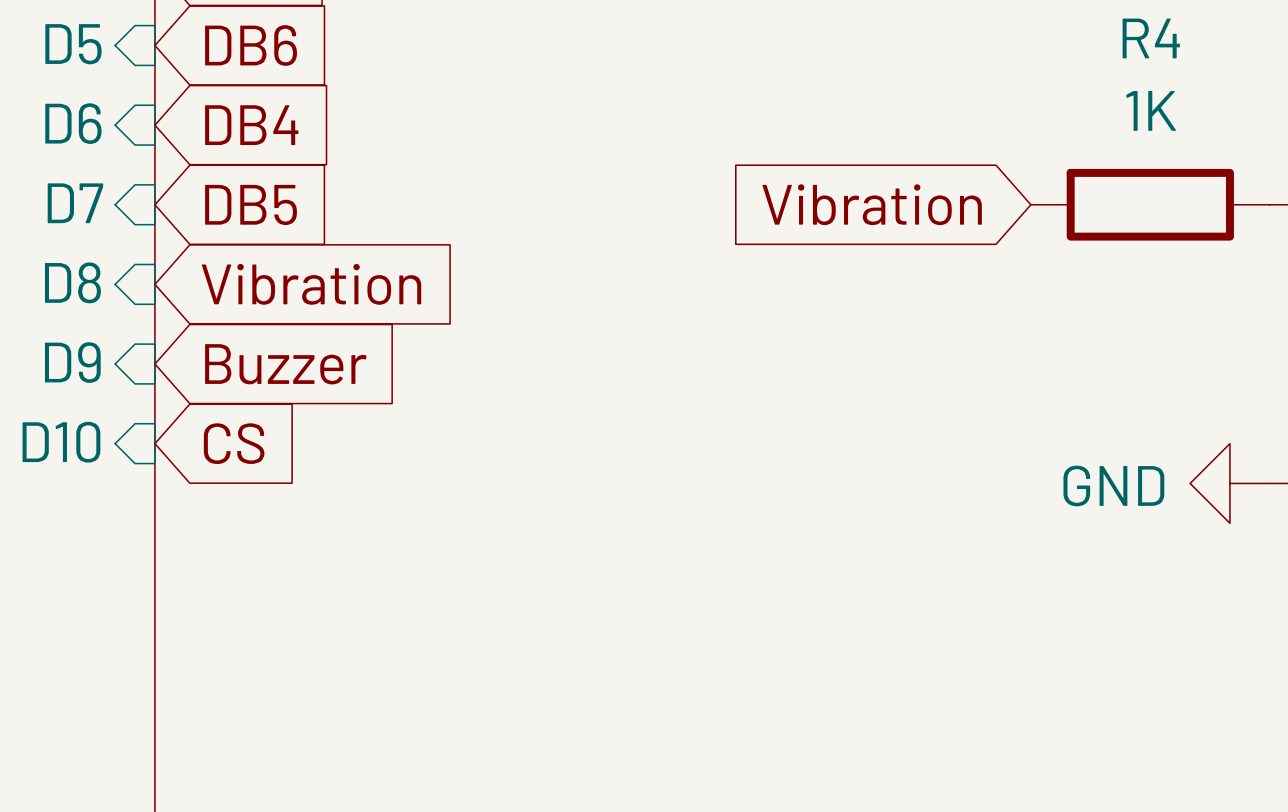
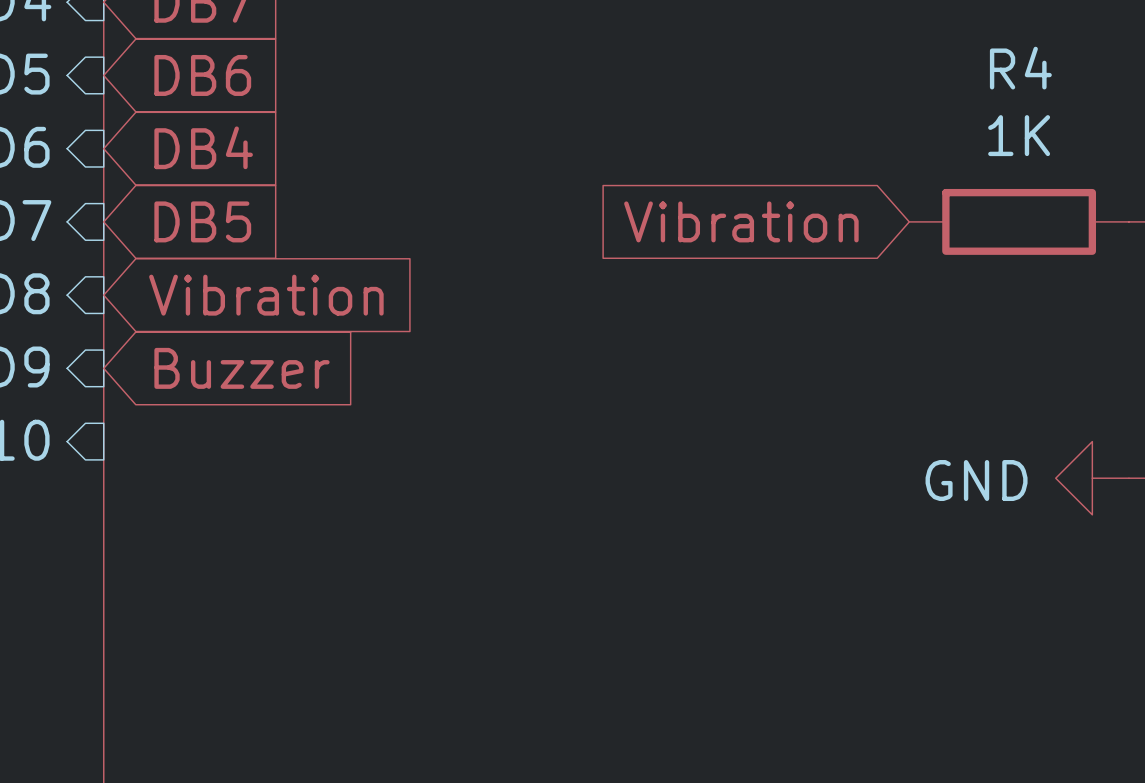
global label: CS (234, 443) -> none

